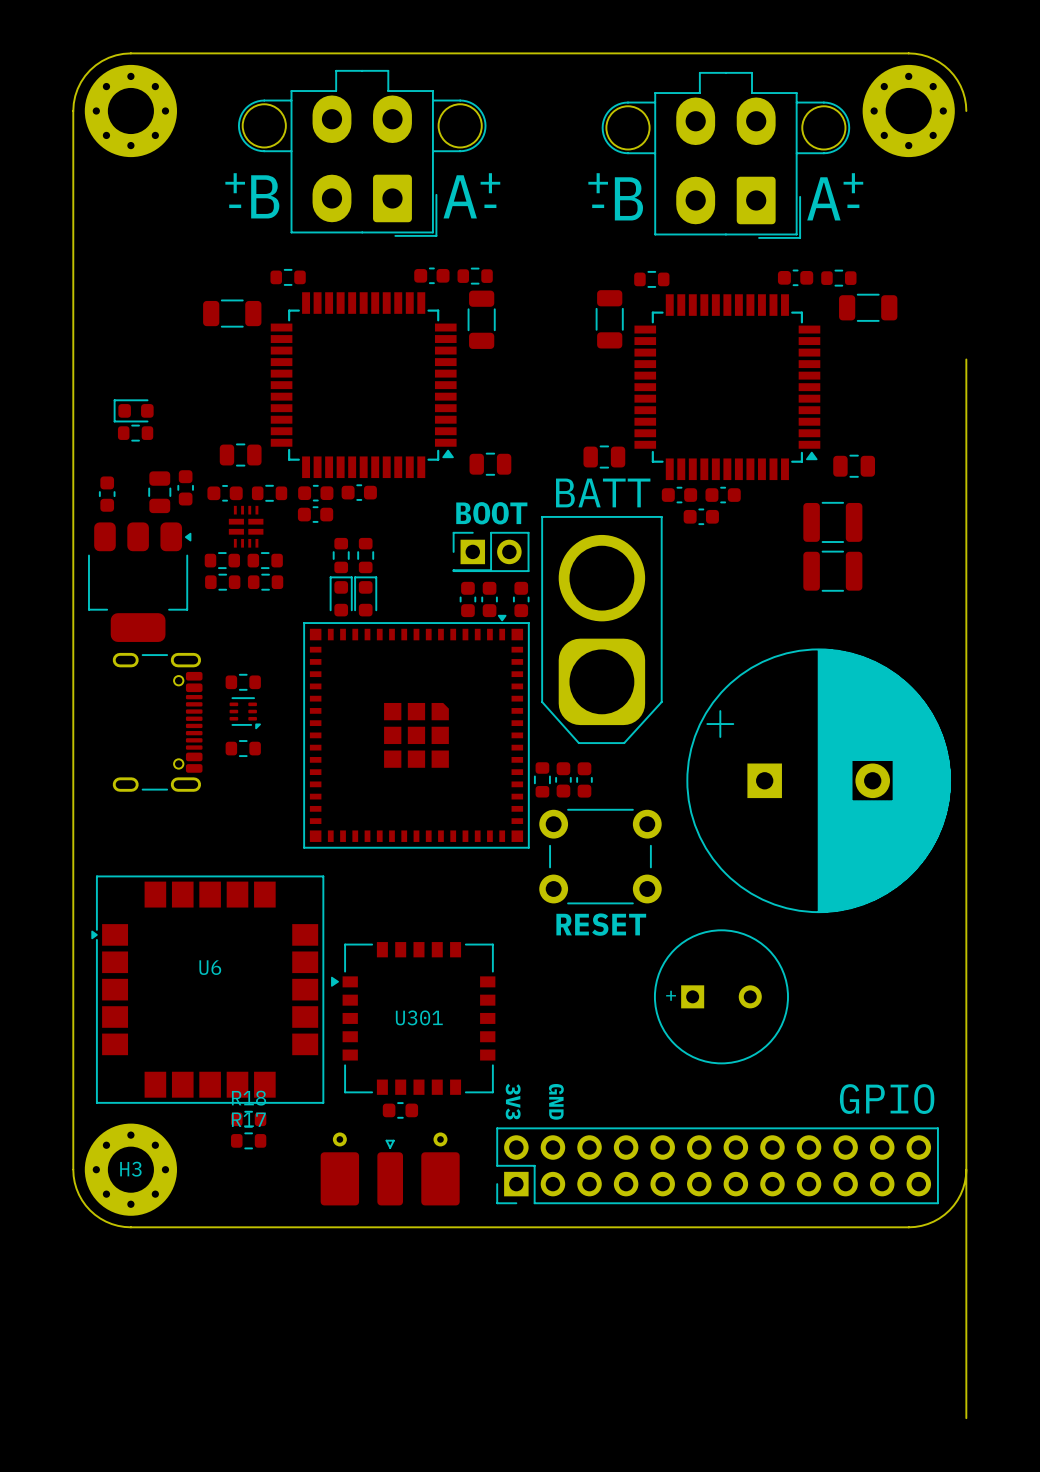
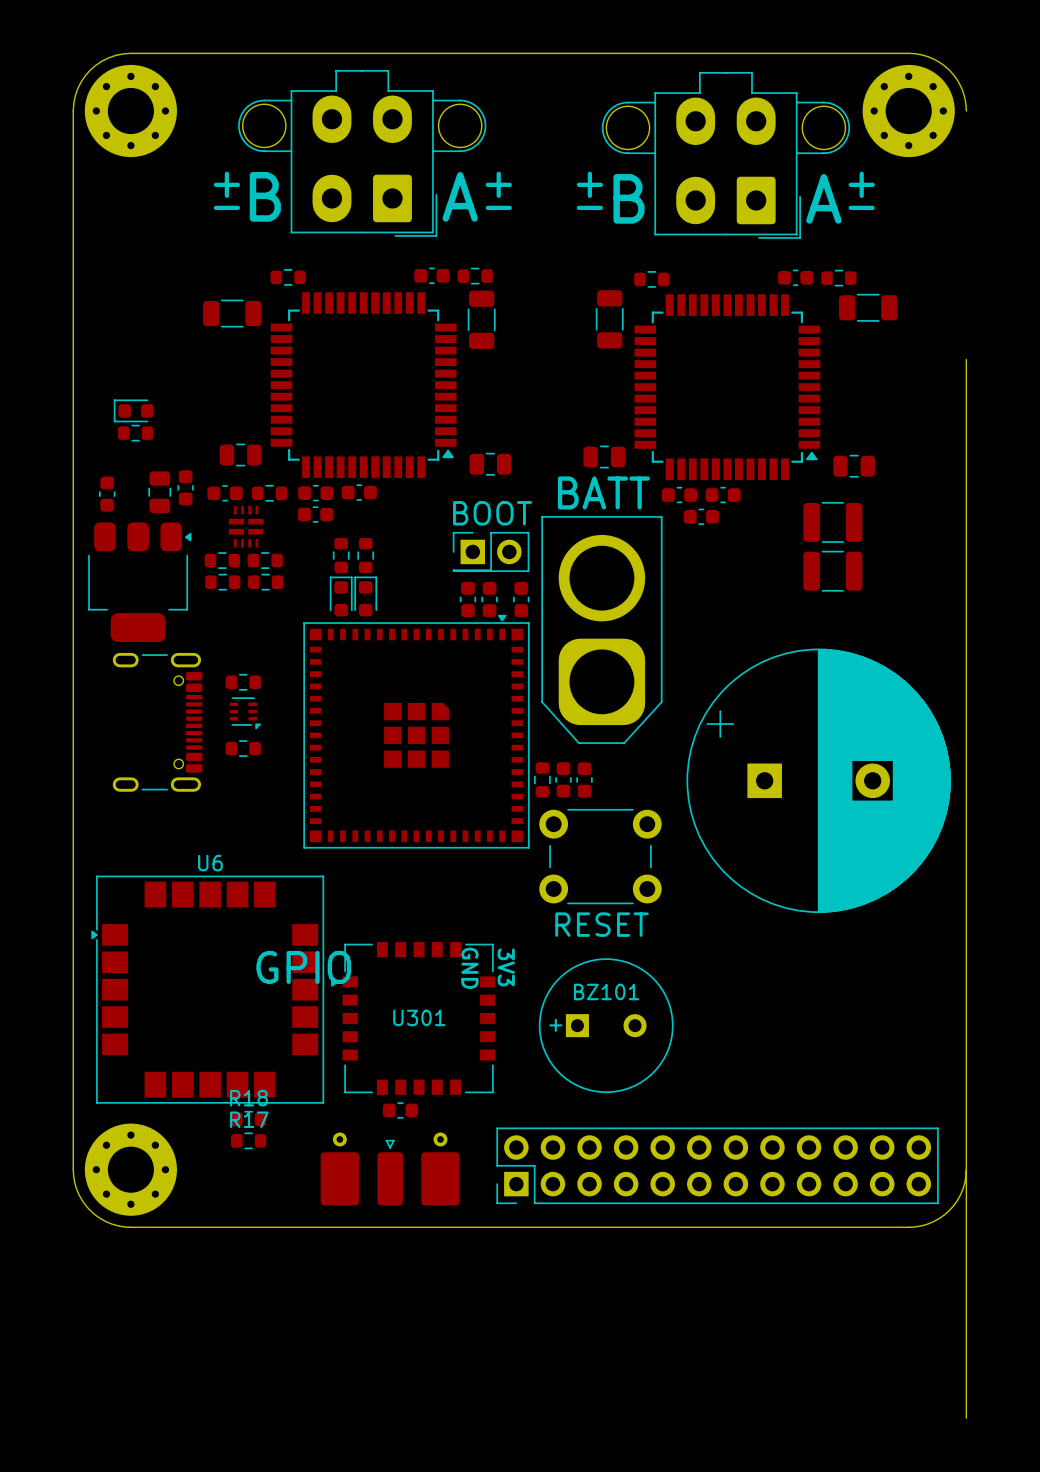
U6 name position: U6 (210, 967) -> U6 (210, 863)
text: none -> GPIO (303, 967)
part: (721, 996) -> none
BZ101: none -> (606, 1025)
text: GPIO (887, 1099) -> none
text position: 3V3 (513, 1101) -> 3V3 (506, 967)
text position: GND (556, 1101) -> GND (469, 968)
H3 name: H3 (130, 1169) -> none

